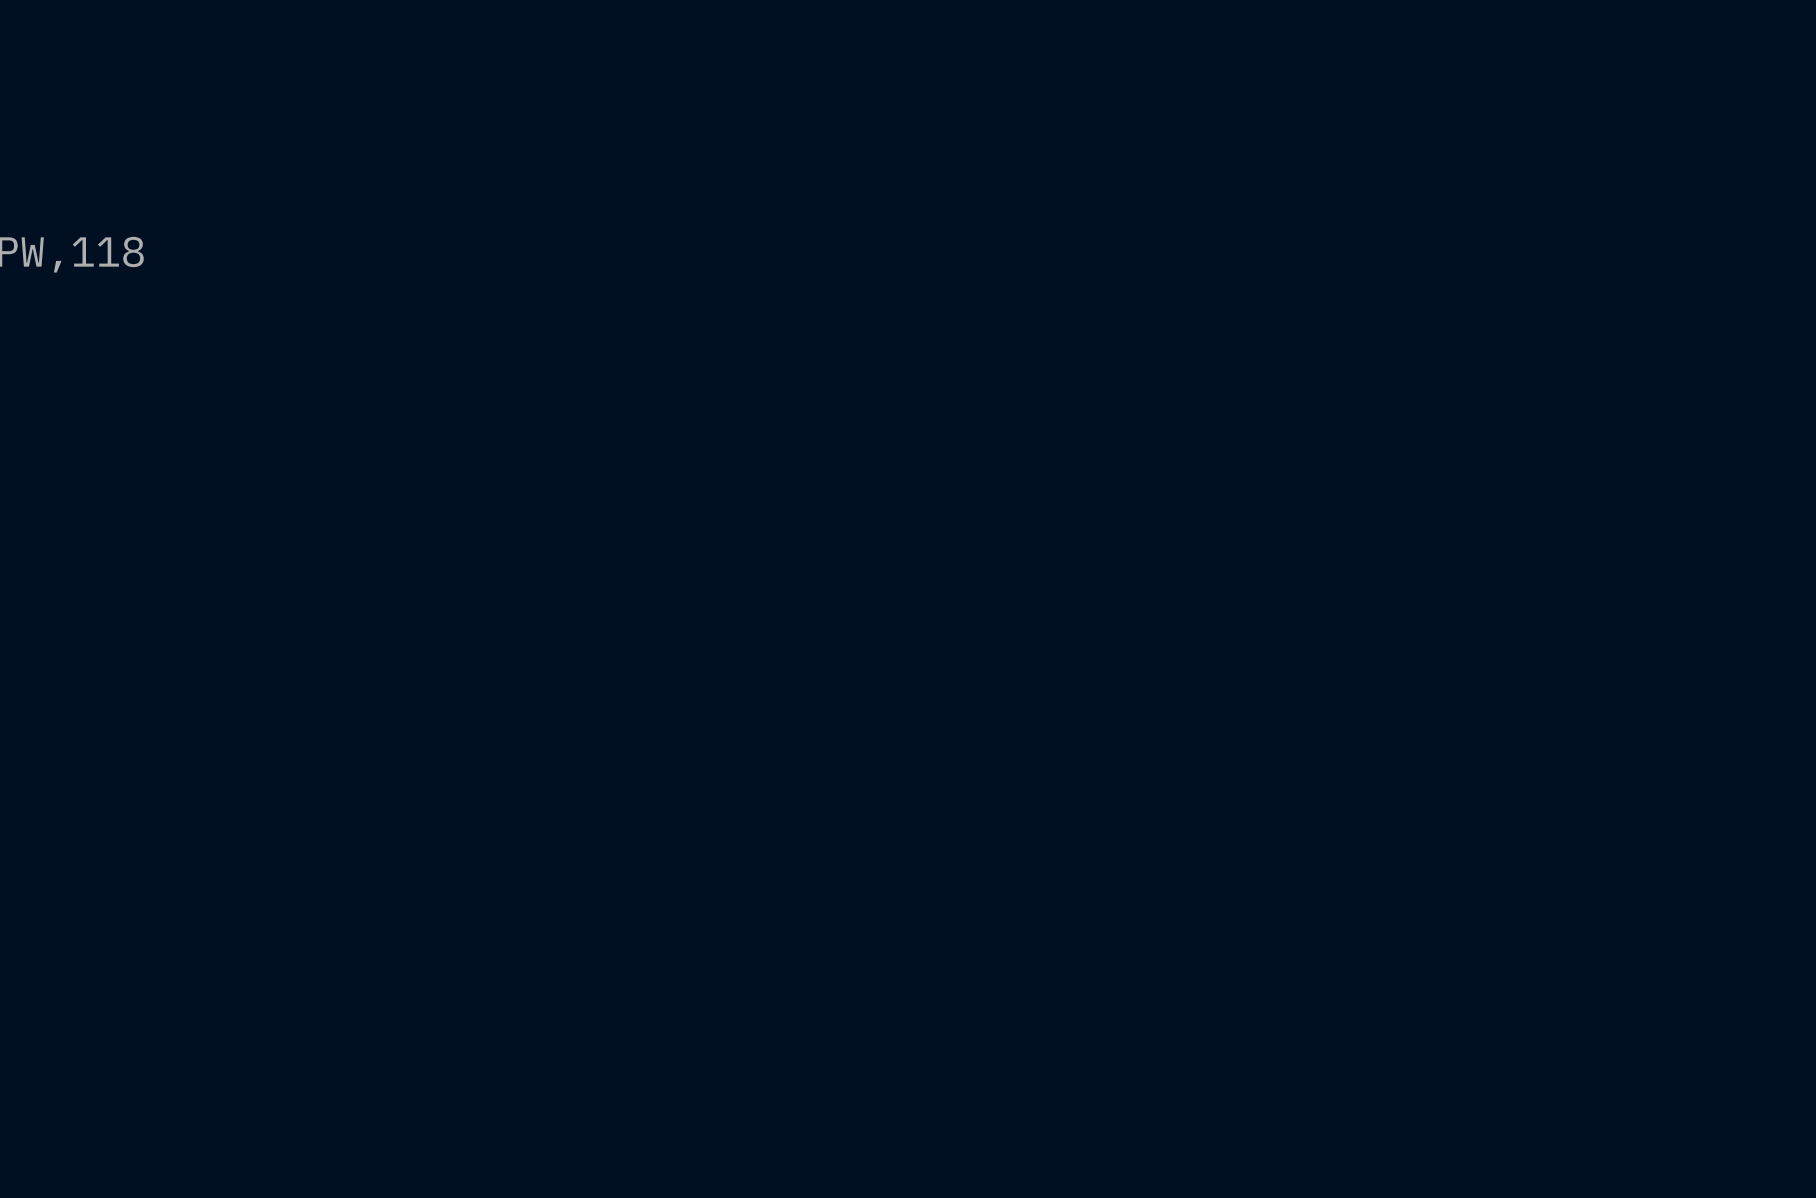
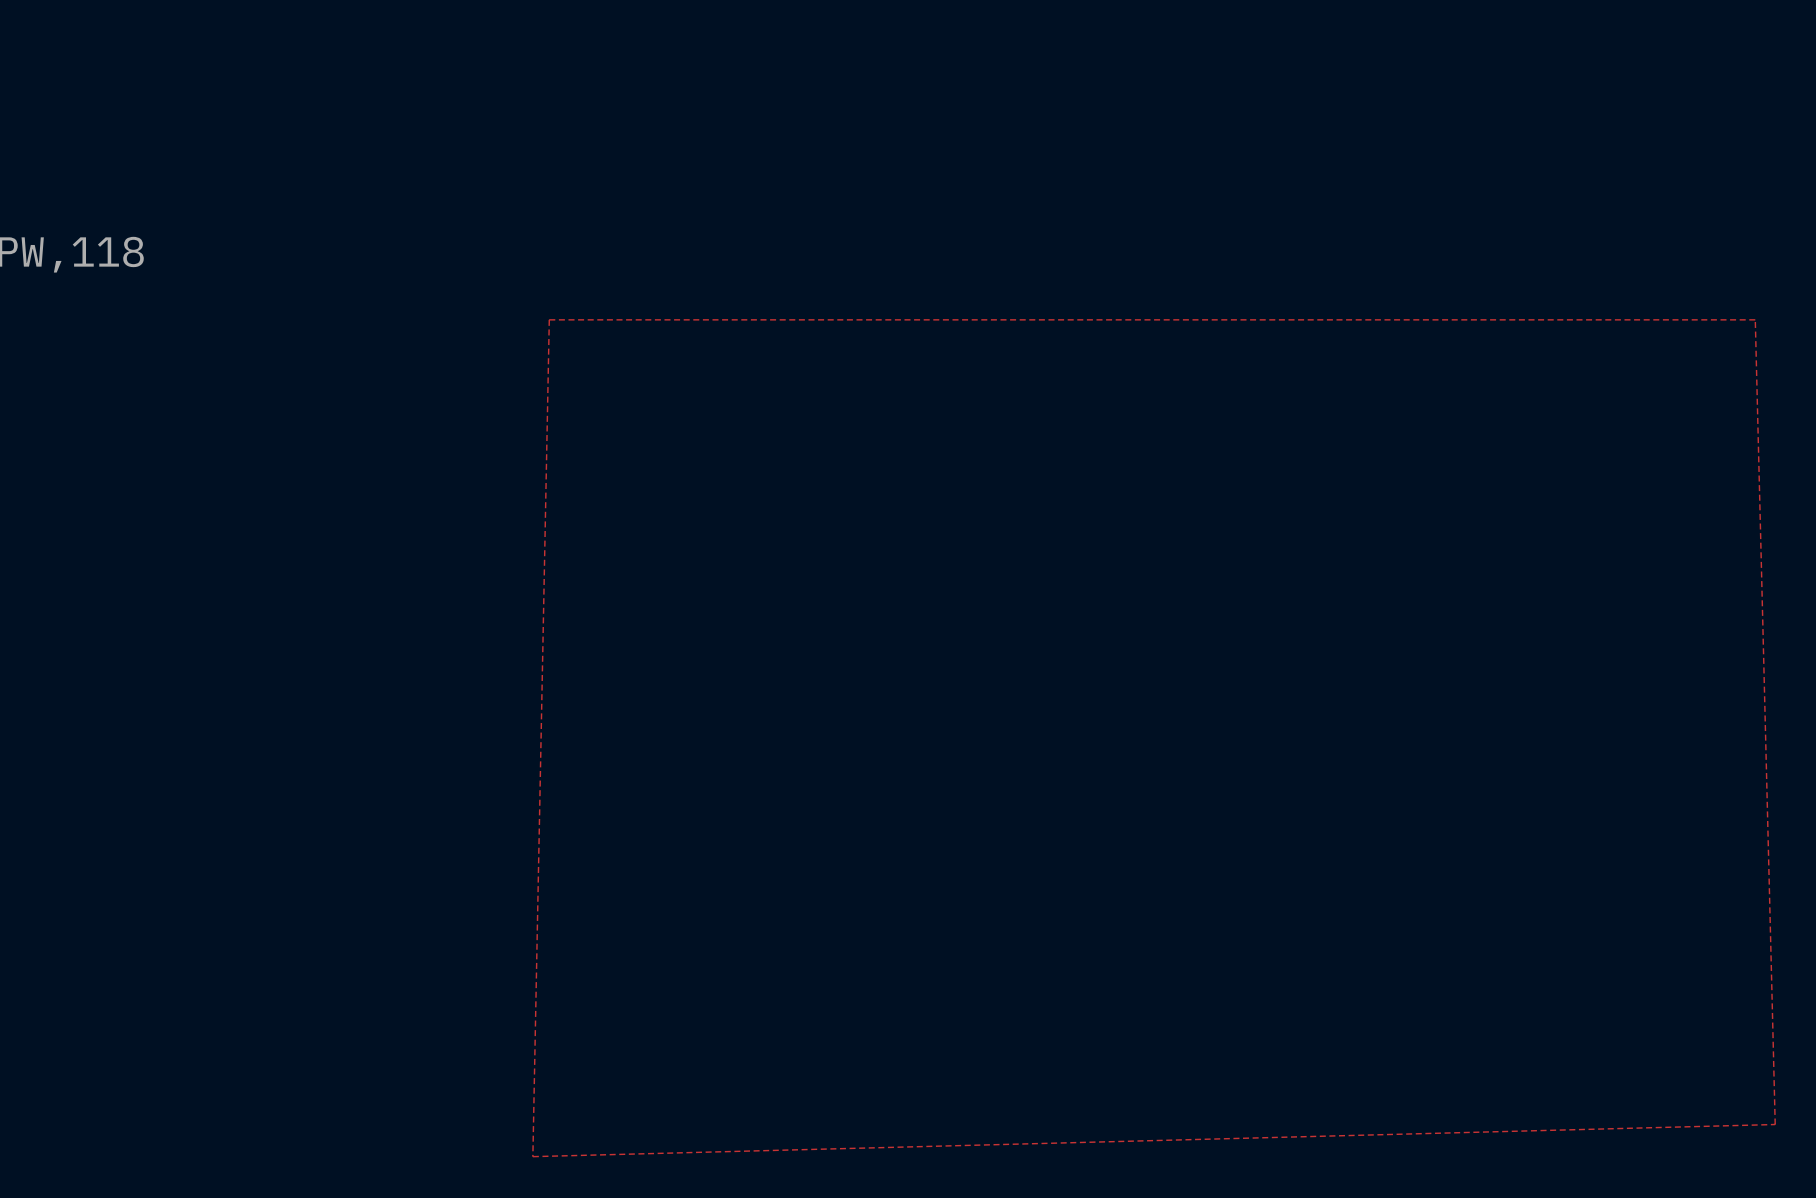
top zone outline: none -> (549, 319) (532, 1156) (1775, 1124) (1755, 319) (549, 319)

